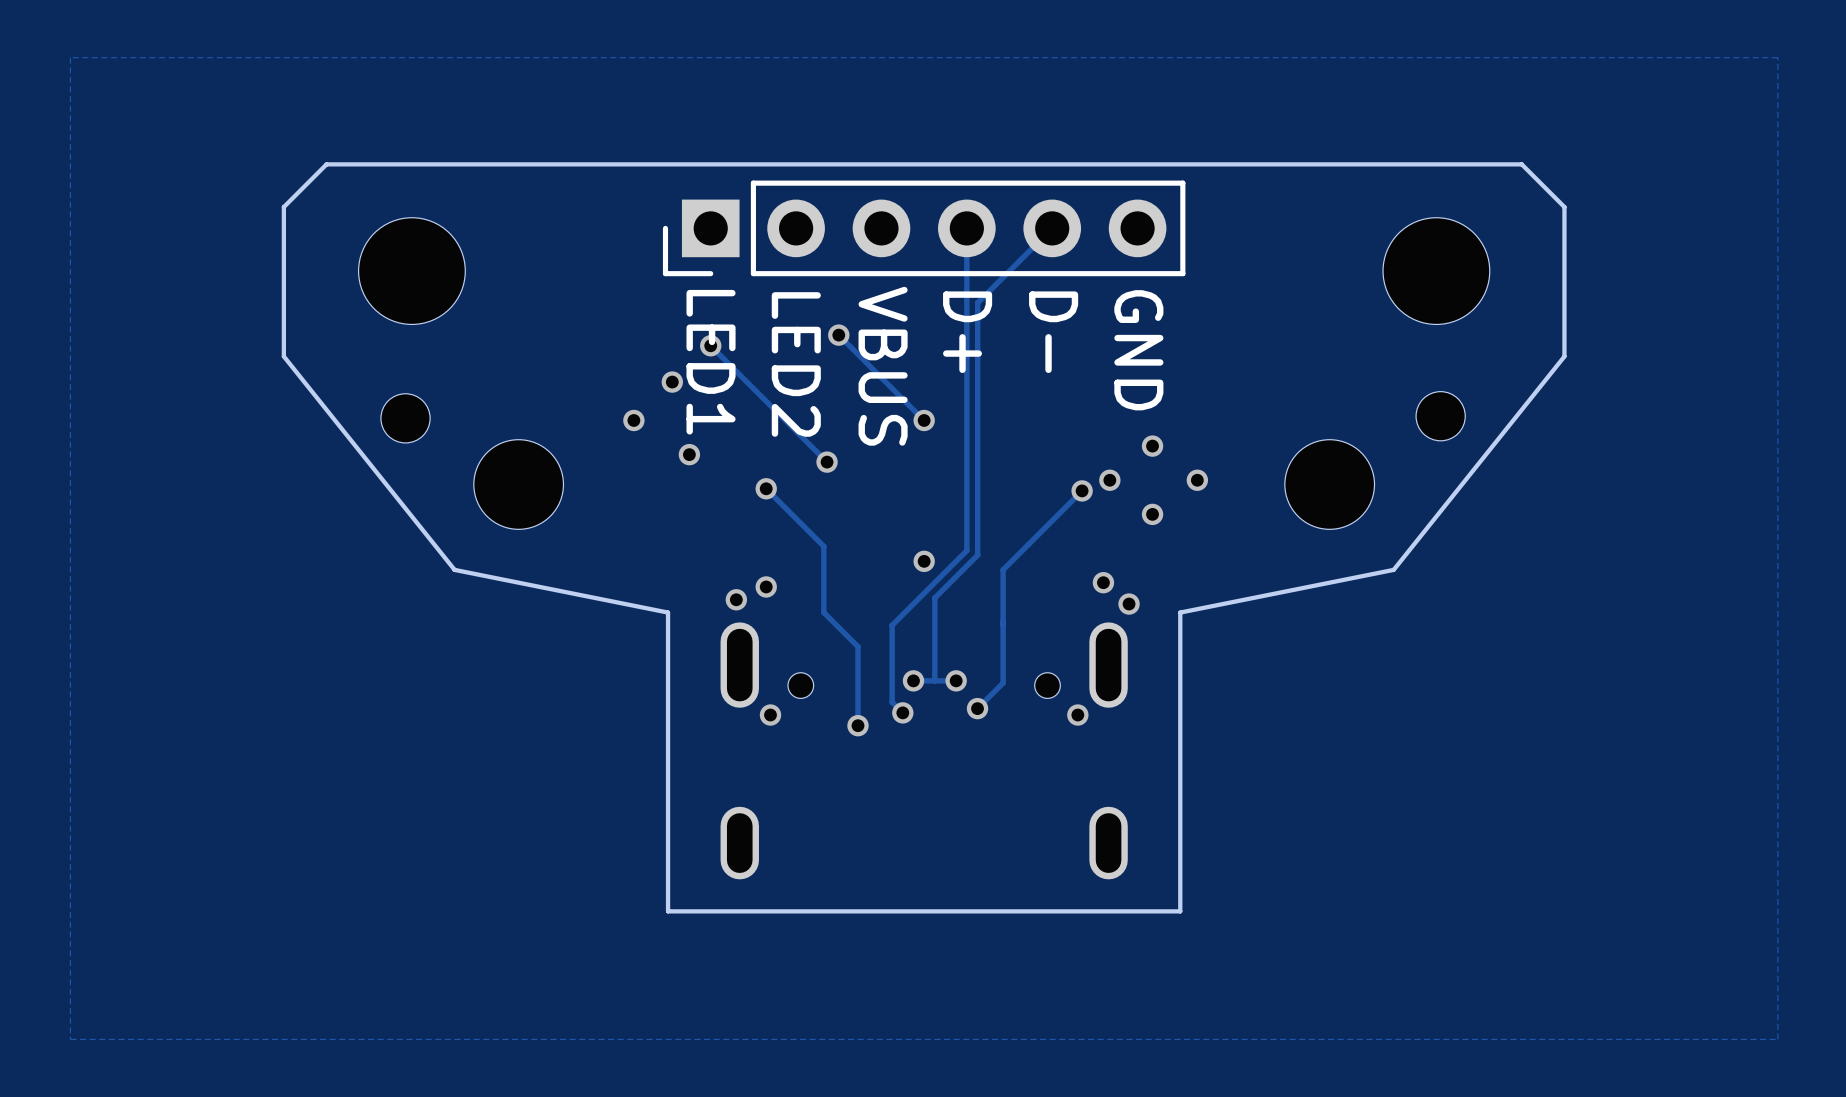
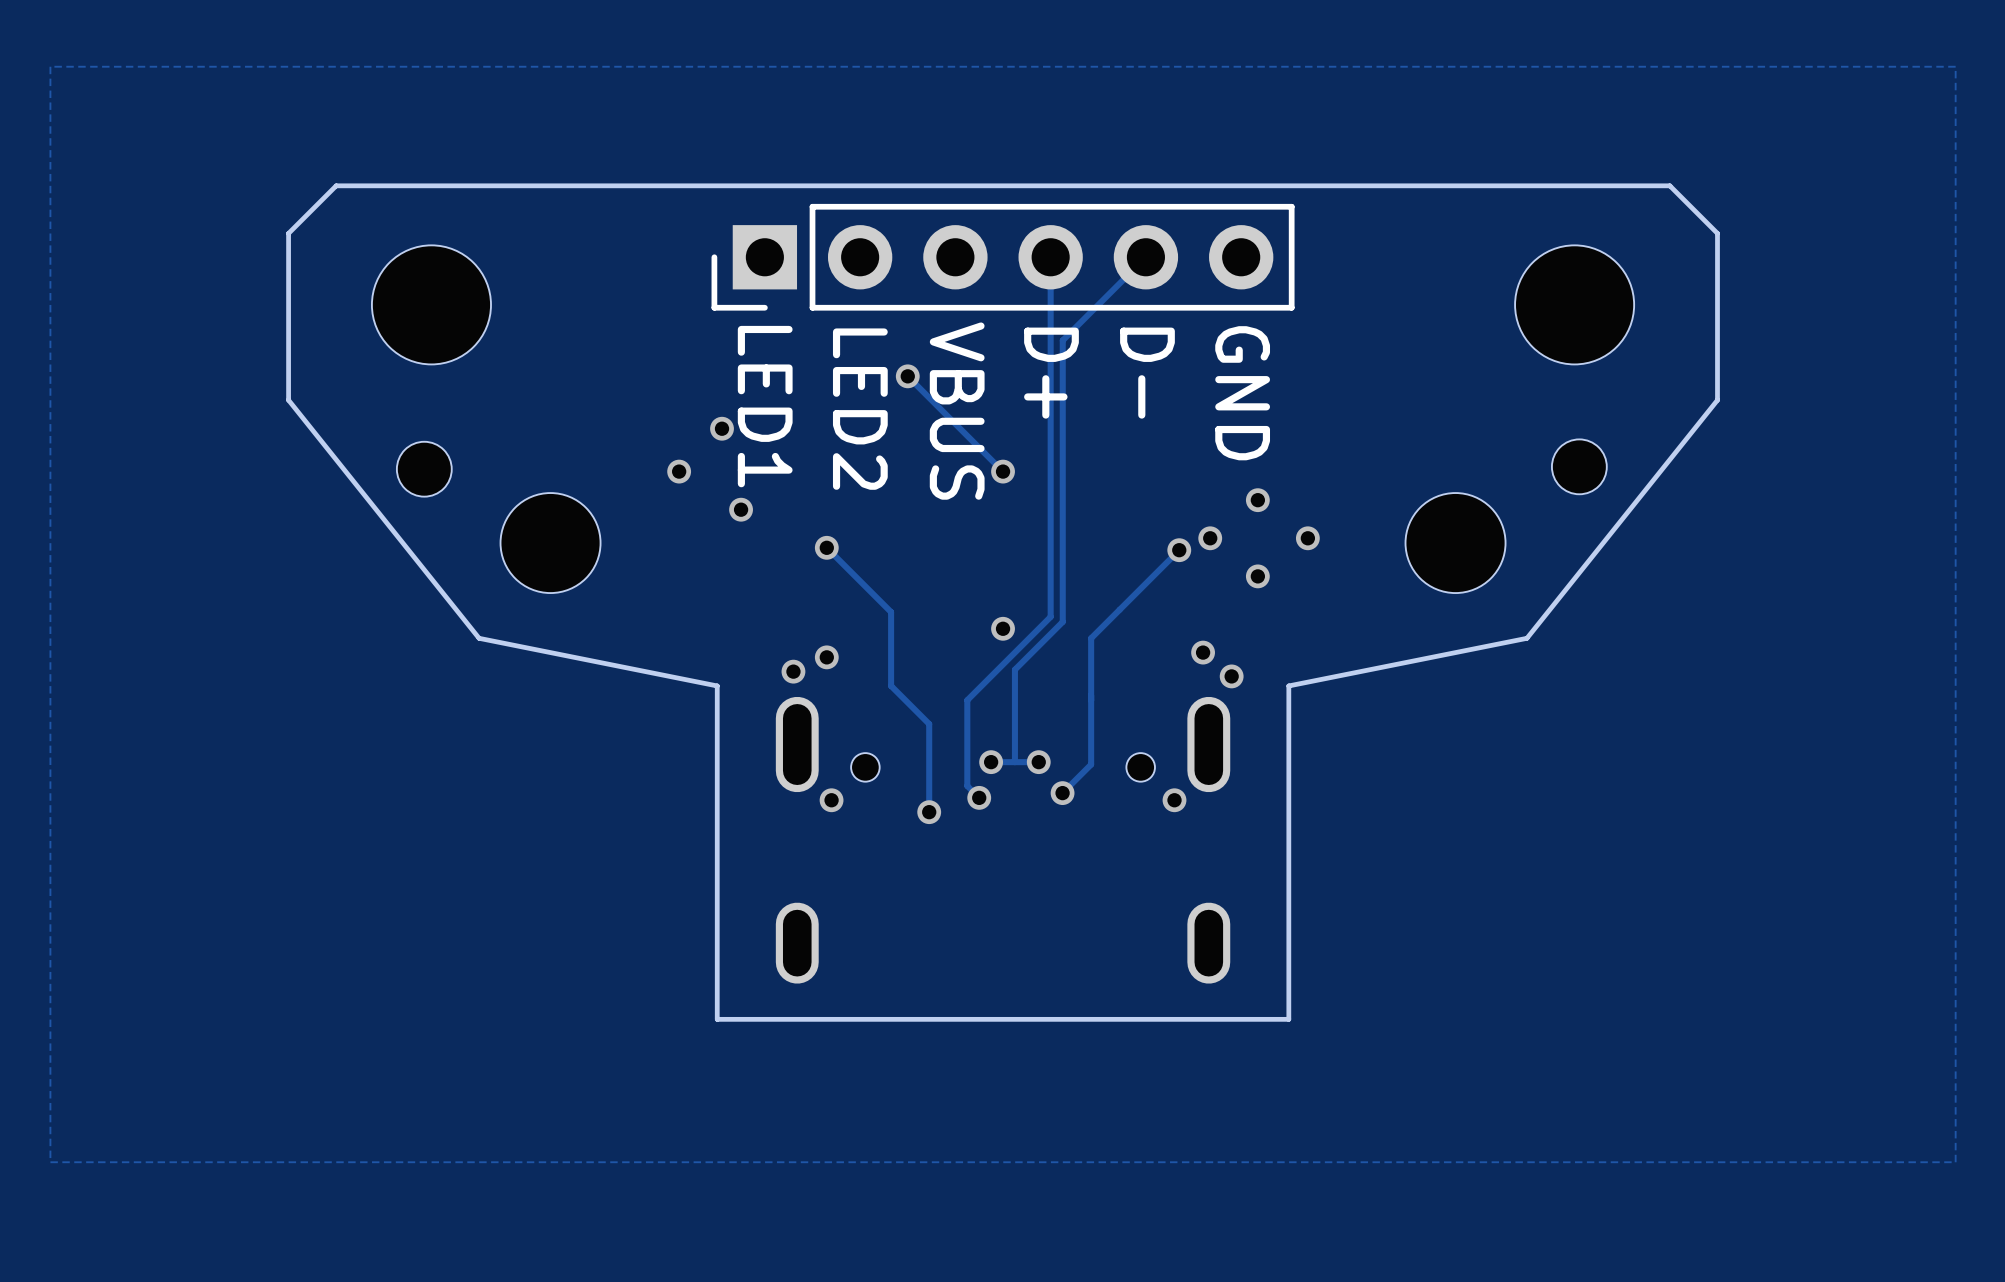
track: (710, 345) (827, 462) -> none
via: (710, 345) -> none
via: (827, 462) -> none

